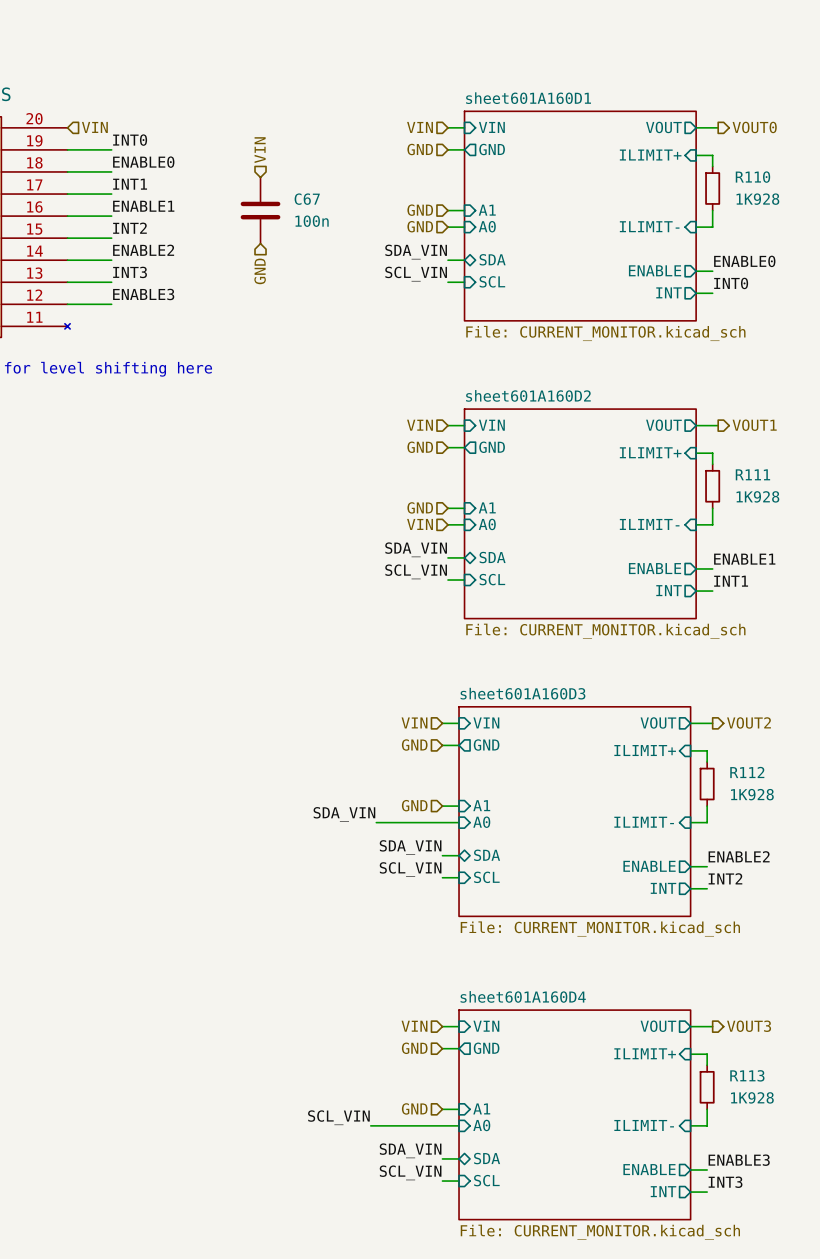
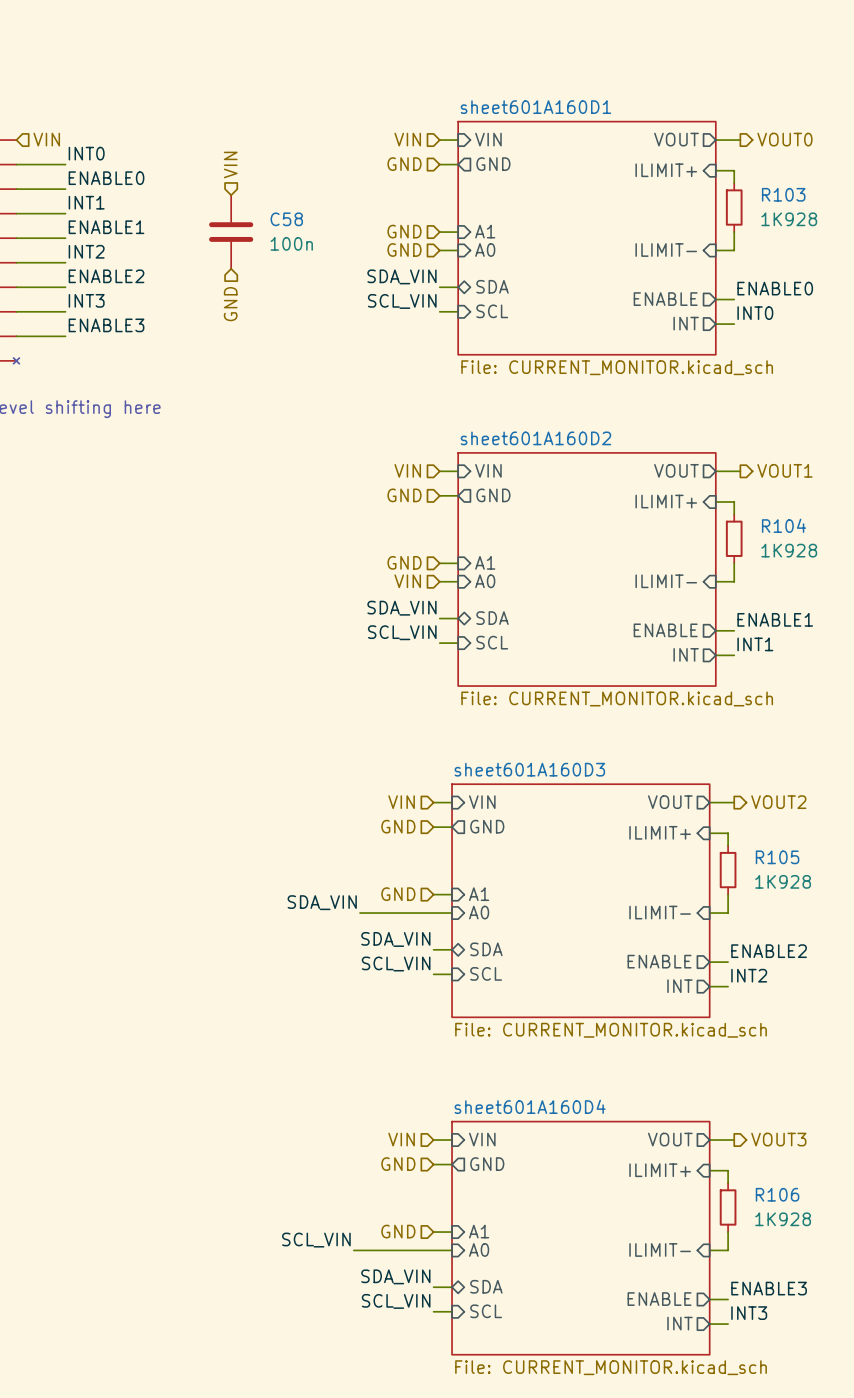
R110 name: R110 (752, 177) -> R103 (783, 194)
C67 name: C67 (307, 199) -> C58 (286, 219)
R111 name: R111 (752, 474) -> R104 (783, 525)
R112 name: R112 (747, 772) -> R105 (777, 857)
R113 name: R113 (747, 1075) -> R106 (777, 1194)

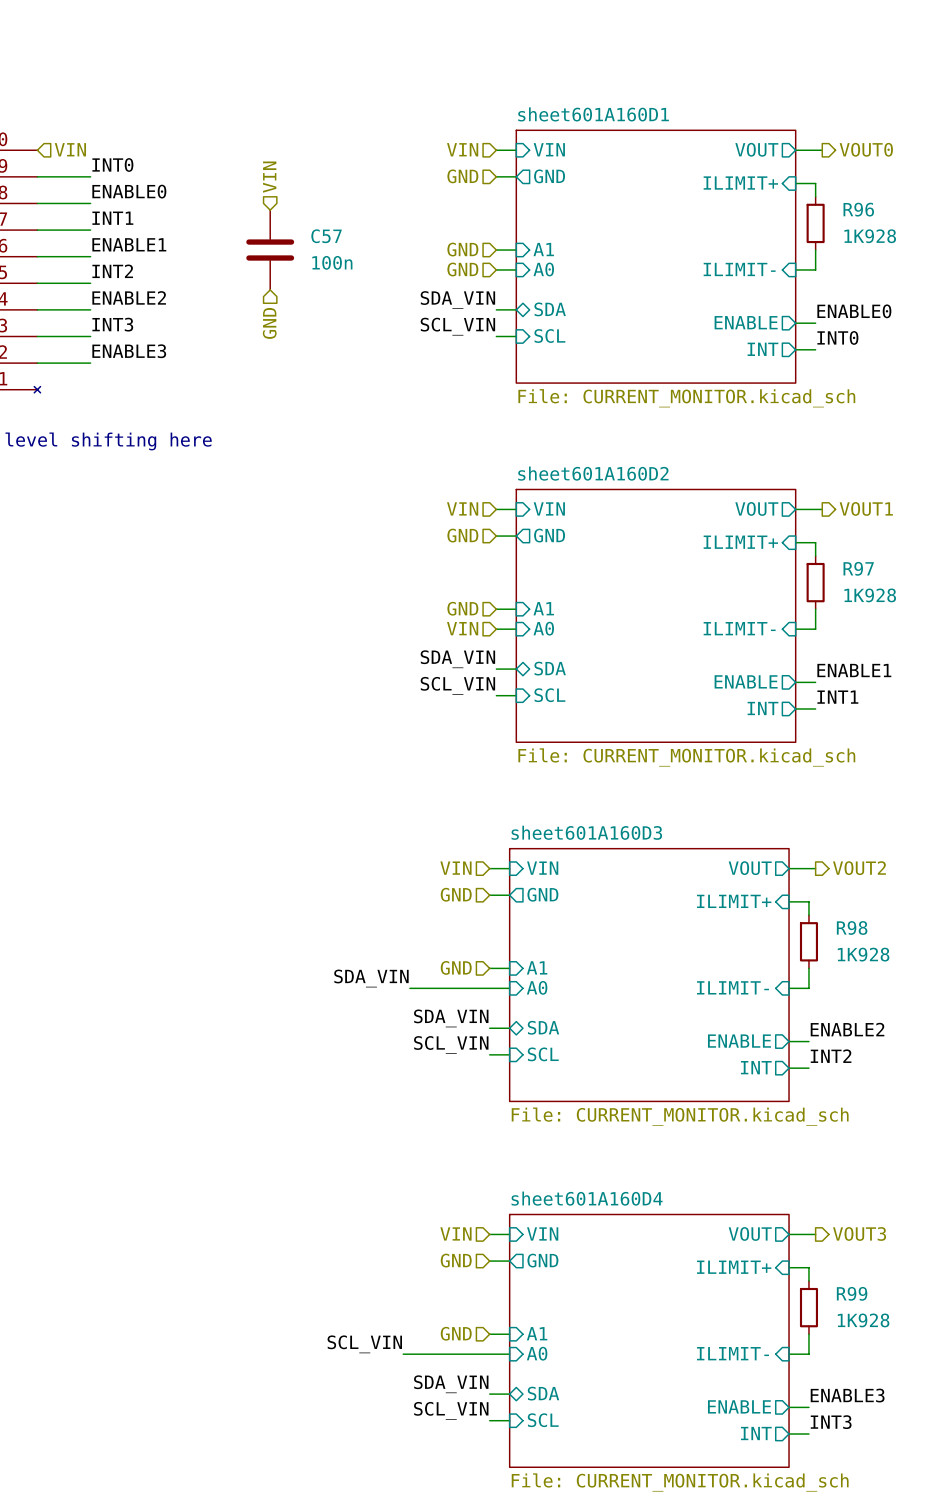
R103 name: R103 (783, 194) -> R96 (858, 209)
C58 name: C58 (286, 219) -> C57 (326, 236)
R104 name: R104 (783, 525) -> R97 (858, 568)
R105 name: R105 (777, 857) -> R98 (852, 928)
R106 name: R106 (777, 1194) -> R99 (852, 1293)

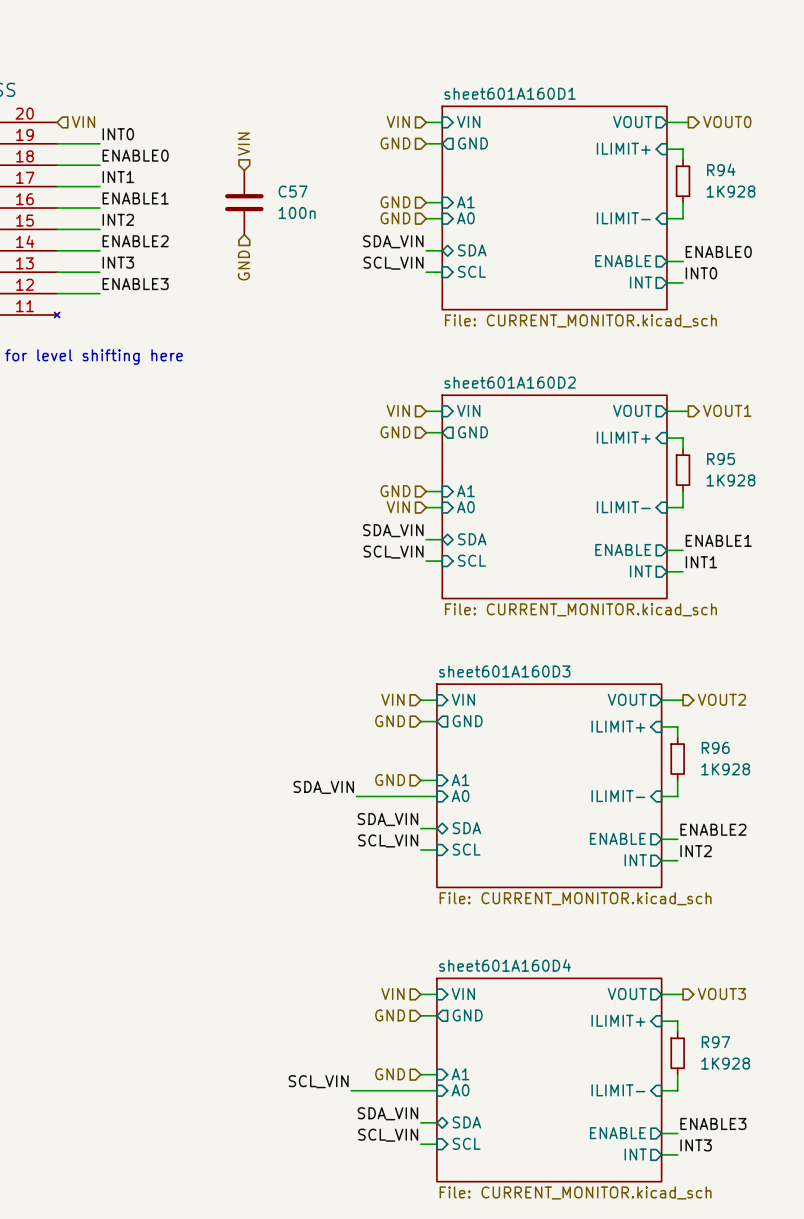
R96 name: R96 (858, 209) -> R94 (721, 169)
R97 name: R97 (858, 568) -> R95 (721, 459)
R98 name: R98 (852, 928) -> R96 (715, 747)
R99 name: R99 (852, 1293) -> R97 (715, 1042)

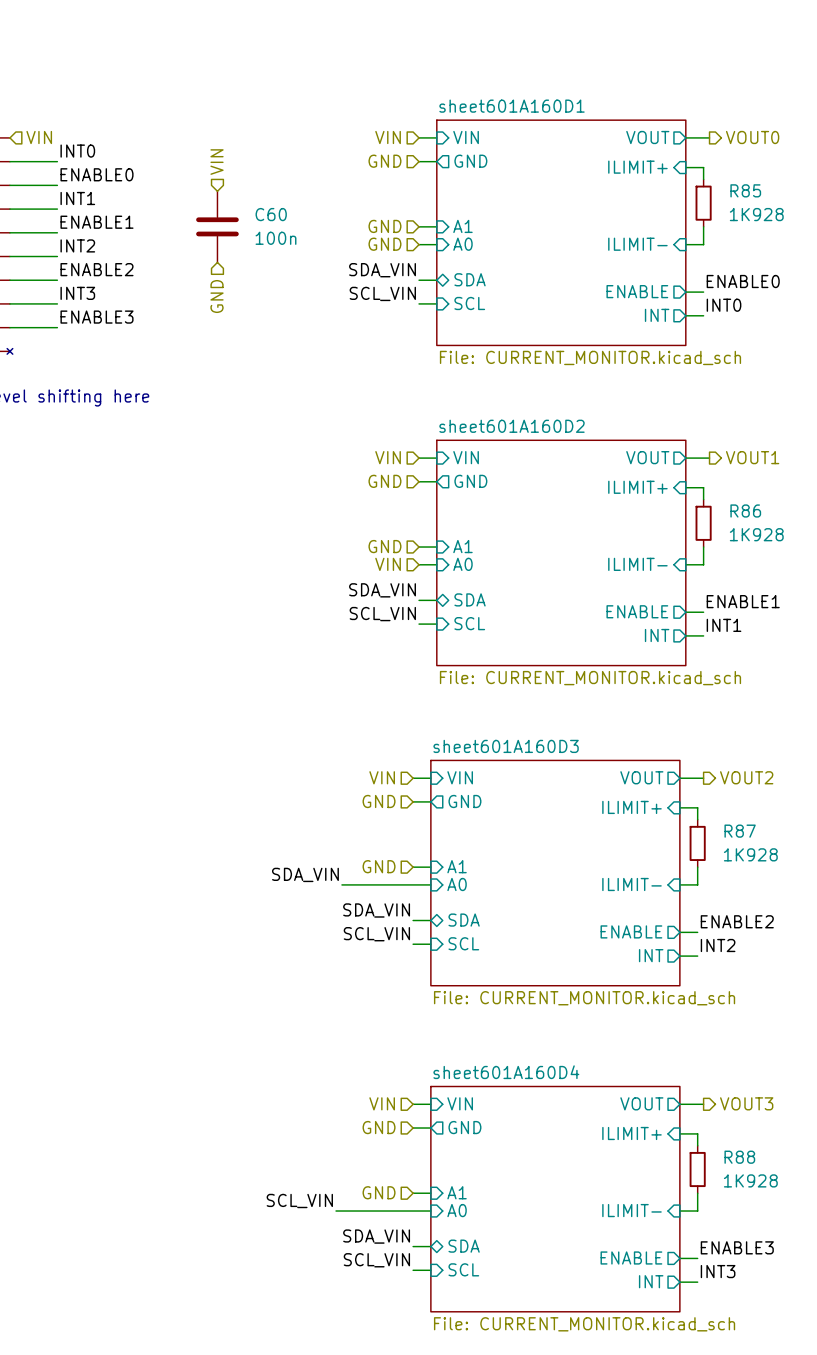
R94 name: R94 (721, 169) -> R85 (745, 190)
C57 name: C57 (293, 191) -> C60 (271, 214)
R95 name: R95 (721, 459) -> R86 (745, 510)
R96 name: R96 (715, 747) -> R87 (740, 831)
R97 name: R97 (715, 1042) -> R88 (739, 1157)

